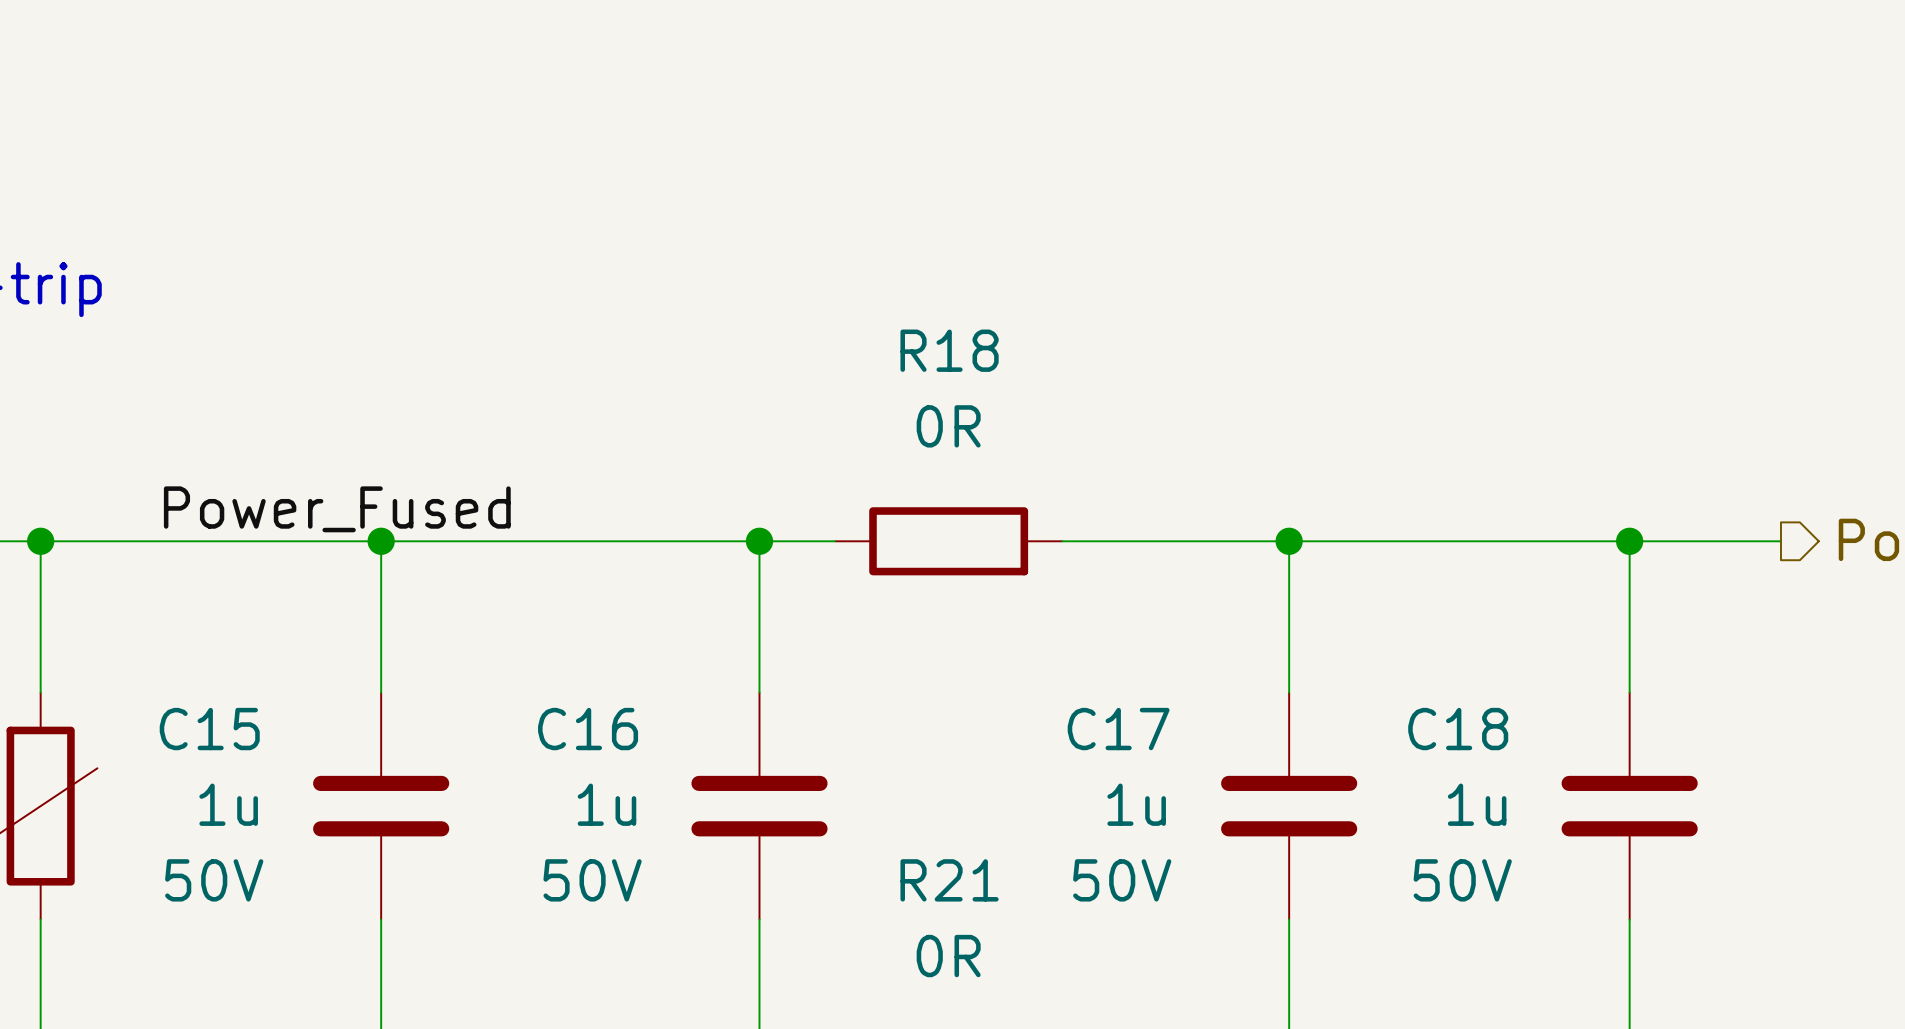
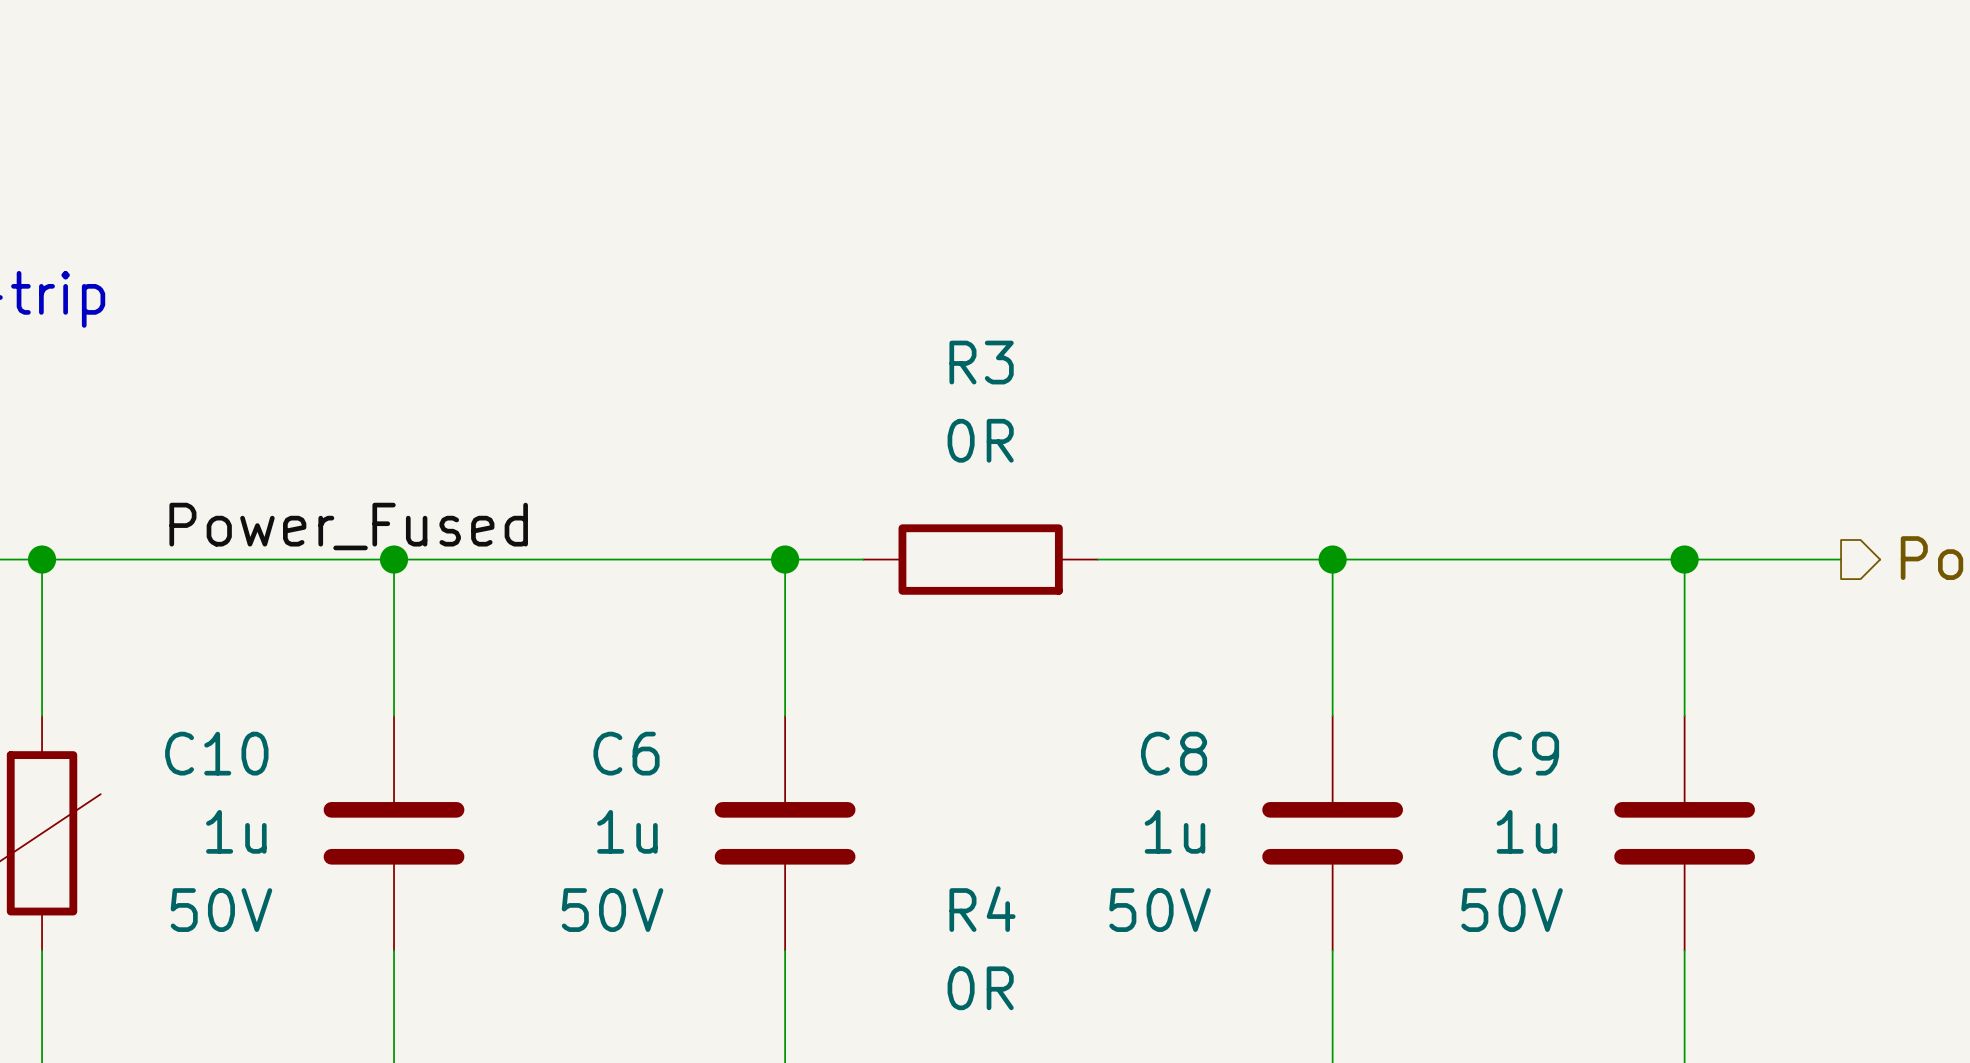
R18 name: R18 (949, 350) -> R3 (981, 362)
C15 name: C15 (209, 729) -> C10 (216, 753)
C16 name: C16 (588, 729) -> C6 (626, 753)
C17 name: C17 (1118, 729) -> C8 (1174, 753)
C18 name: C18 (1458, 729) -> C9 (1526, 753)
R21 name: R21 (949, 880) -> R4 (982, 909)

